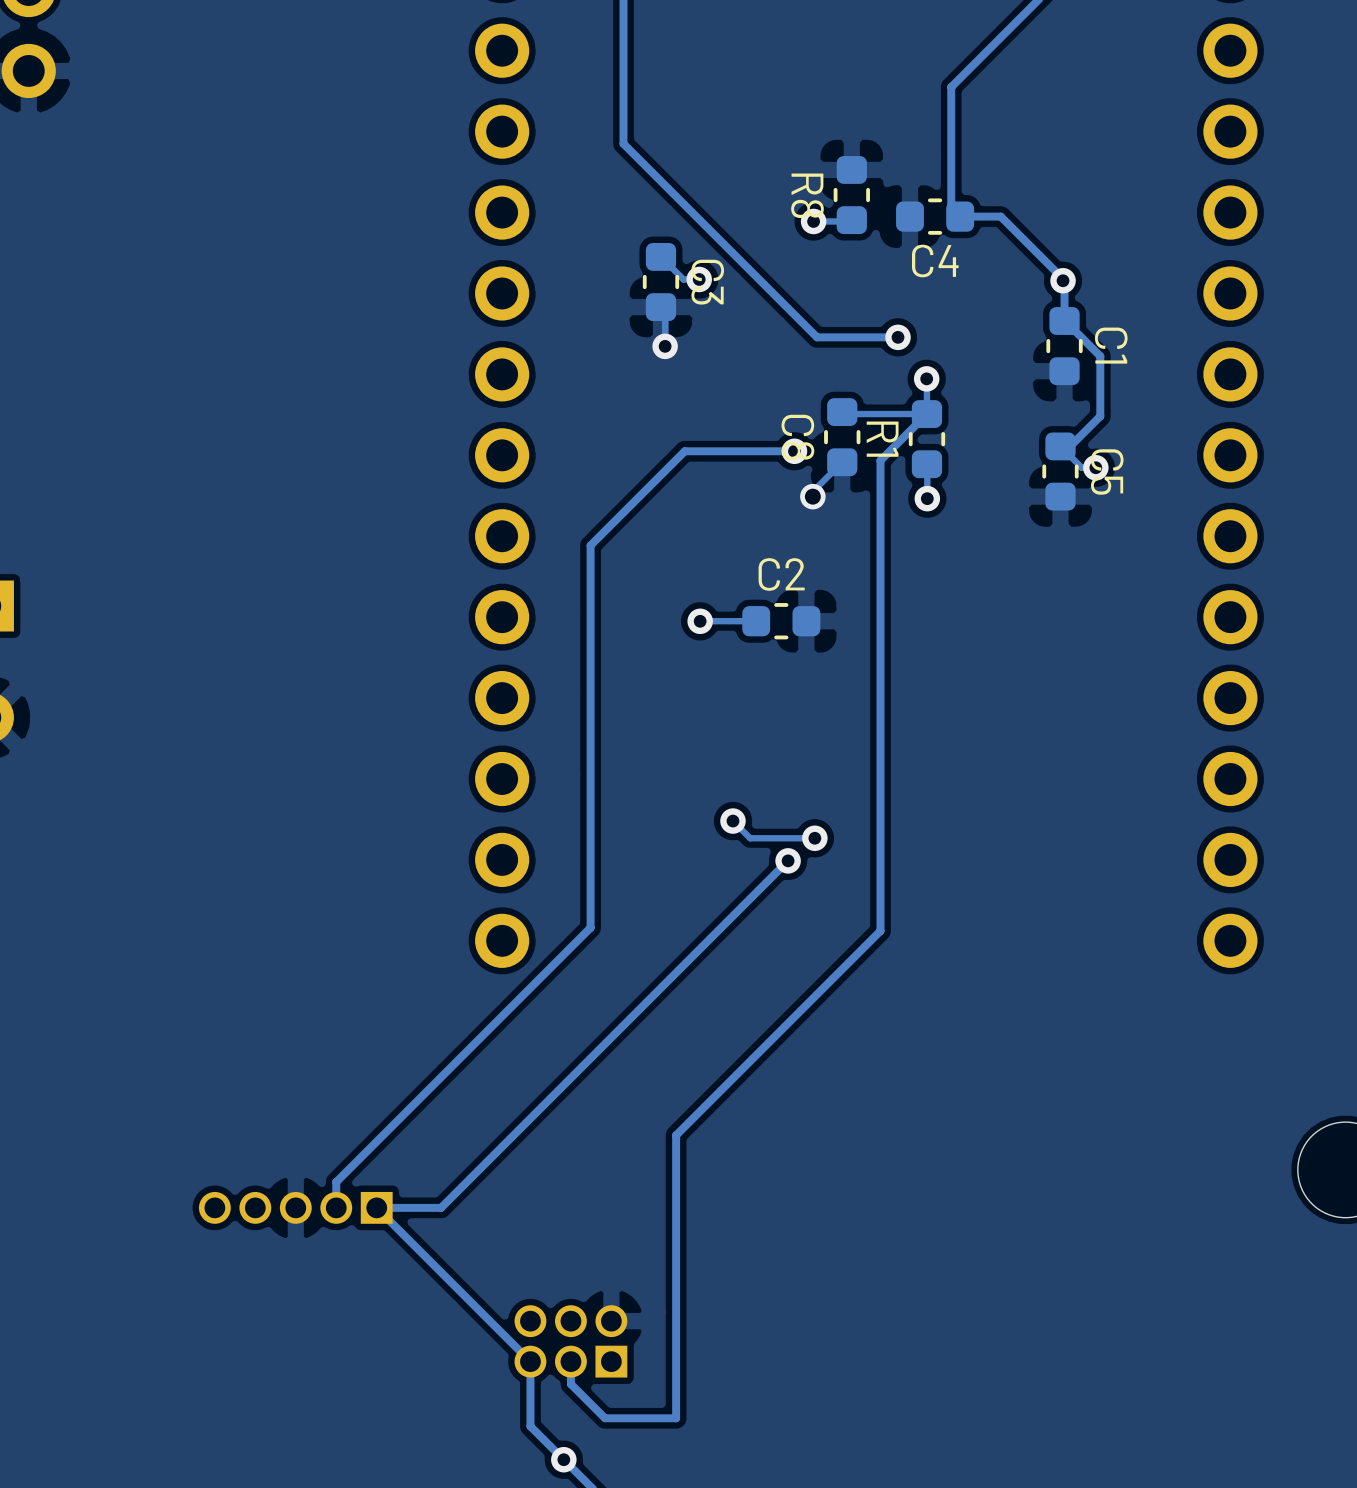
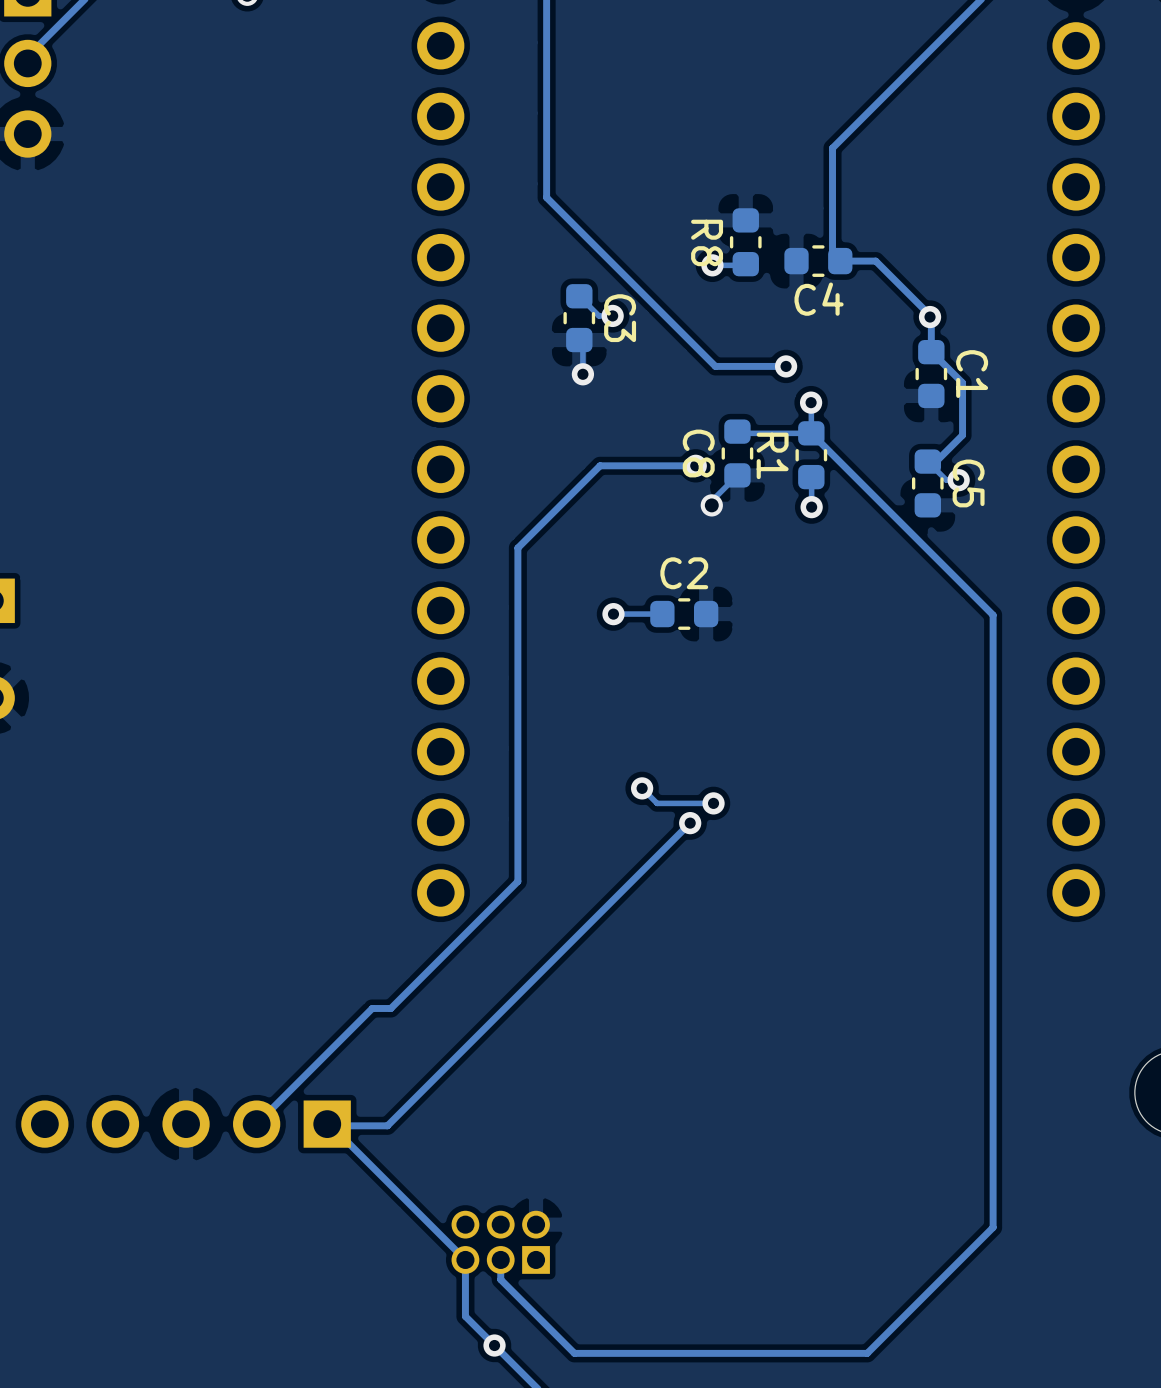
track: (926, 414) (880, 460) (880, 930) (676, 1135) (676, 1418) (605, 1418) -> (811, 433) (993, 615) (993, 1227) (867, 1353) (574, 1353) (530, 1309)
track: (444, 1073) (336, 1182) (336, 1207) -> (390, 1008) (372, 1008) (256, 1124)
part: none -> (186, 1124)
part: (295, 1207) -> none

